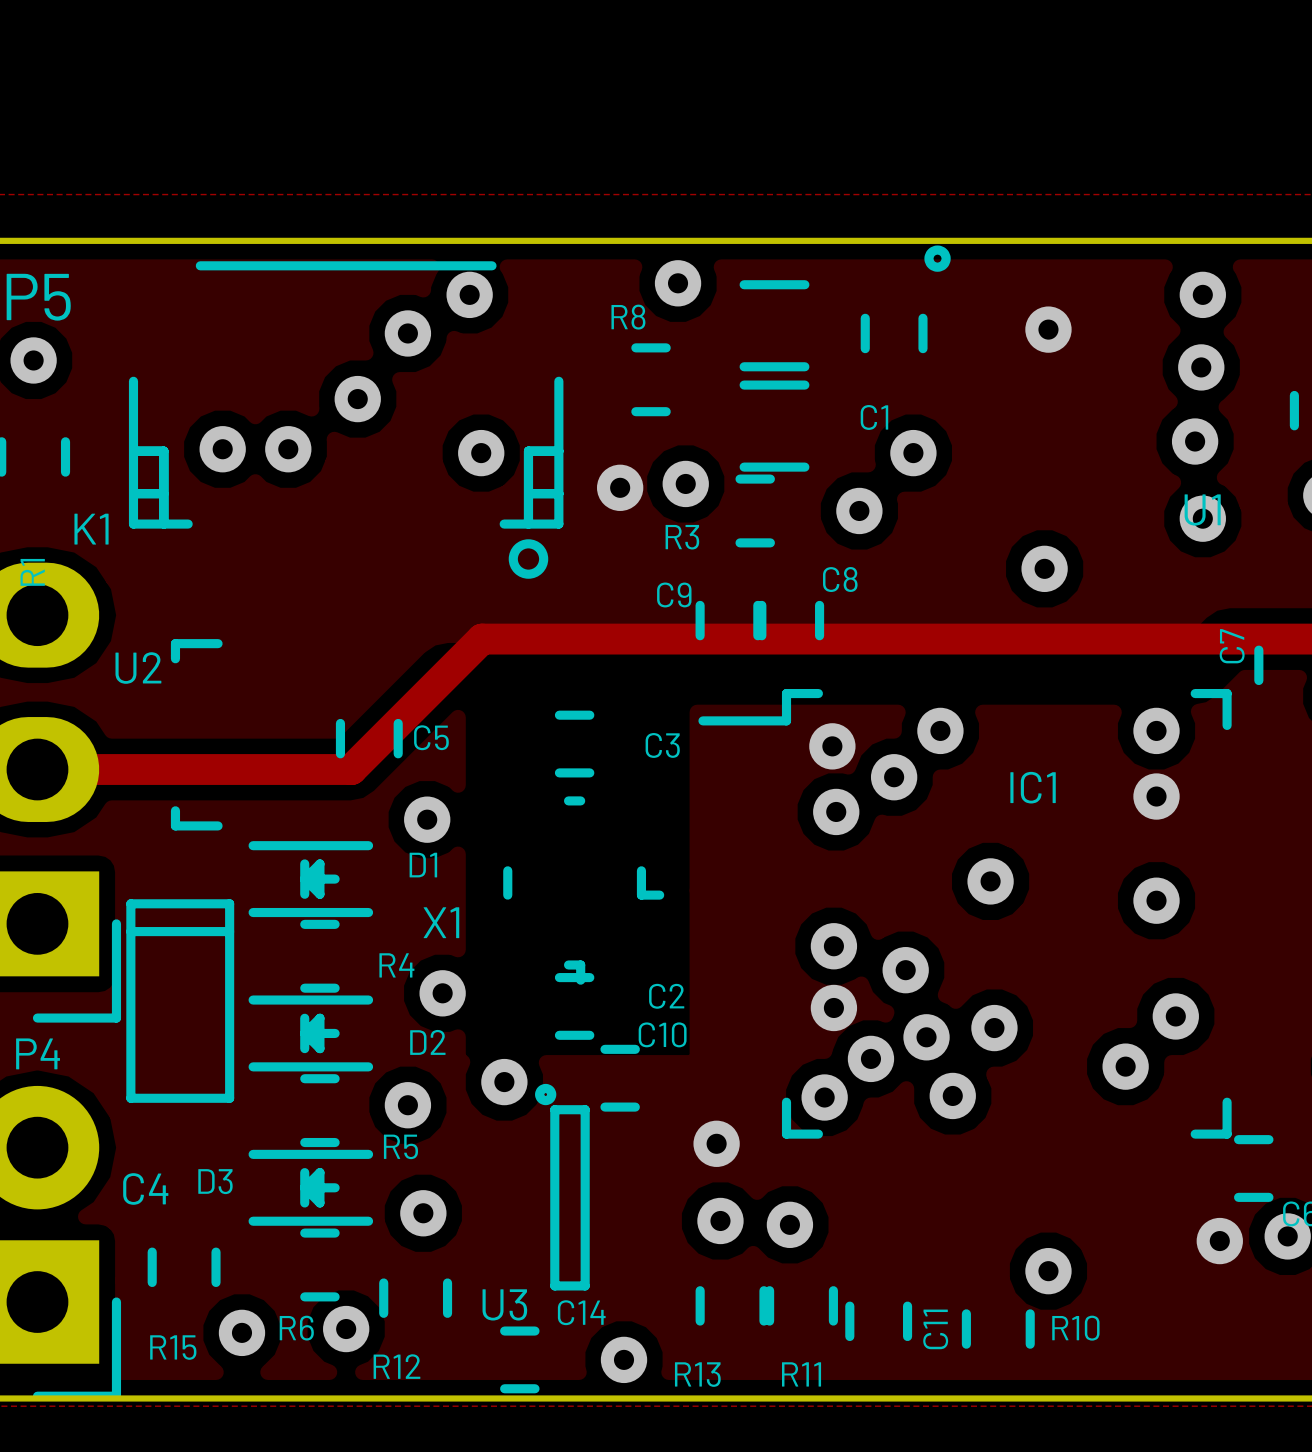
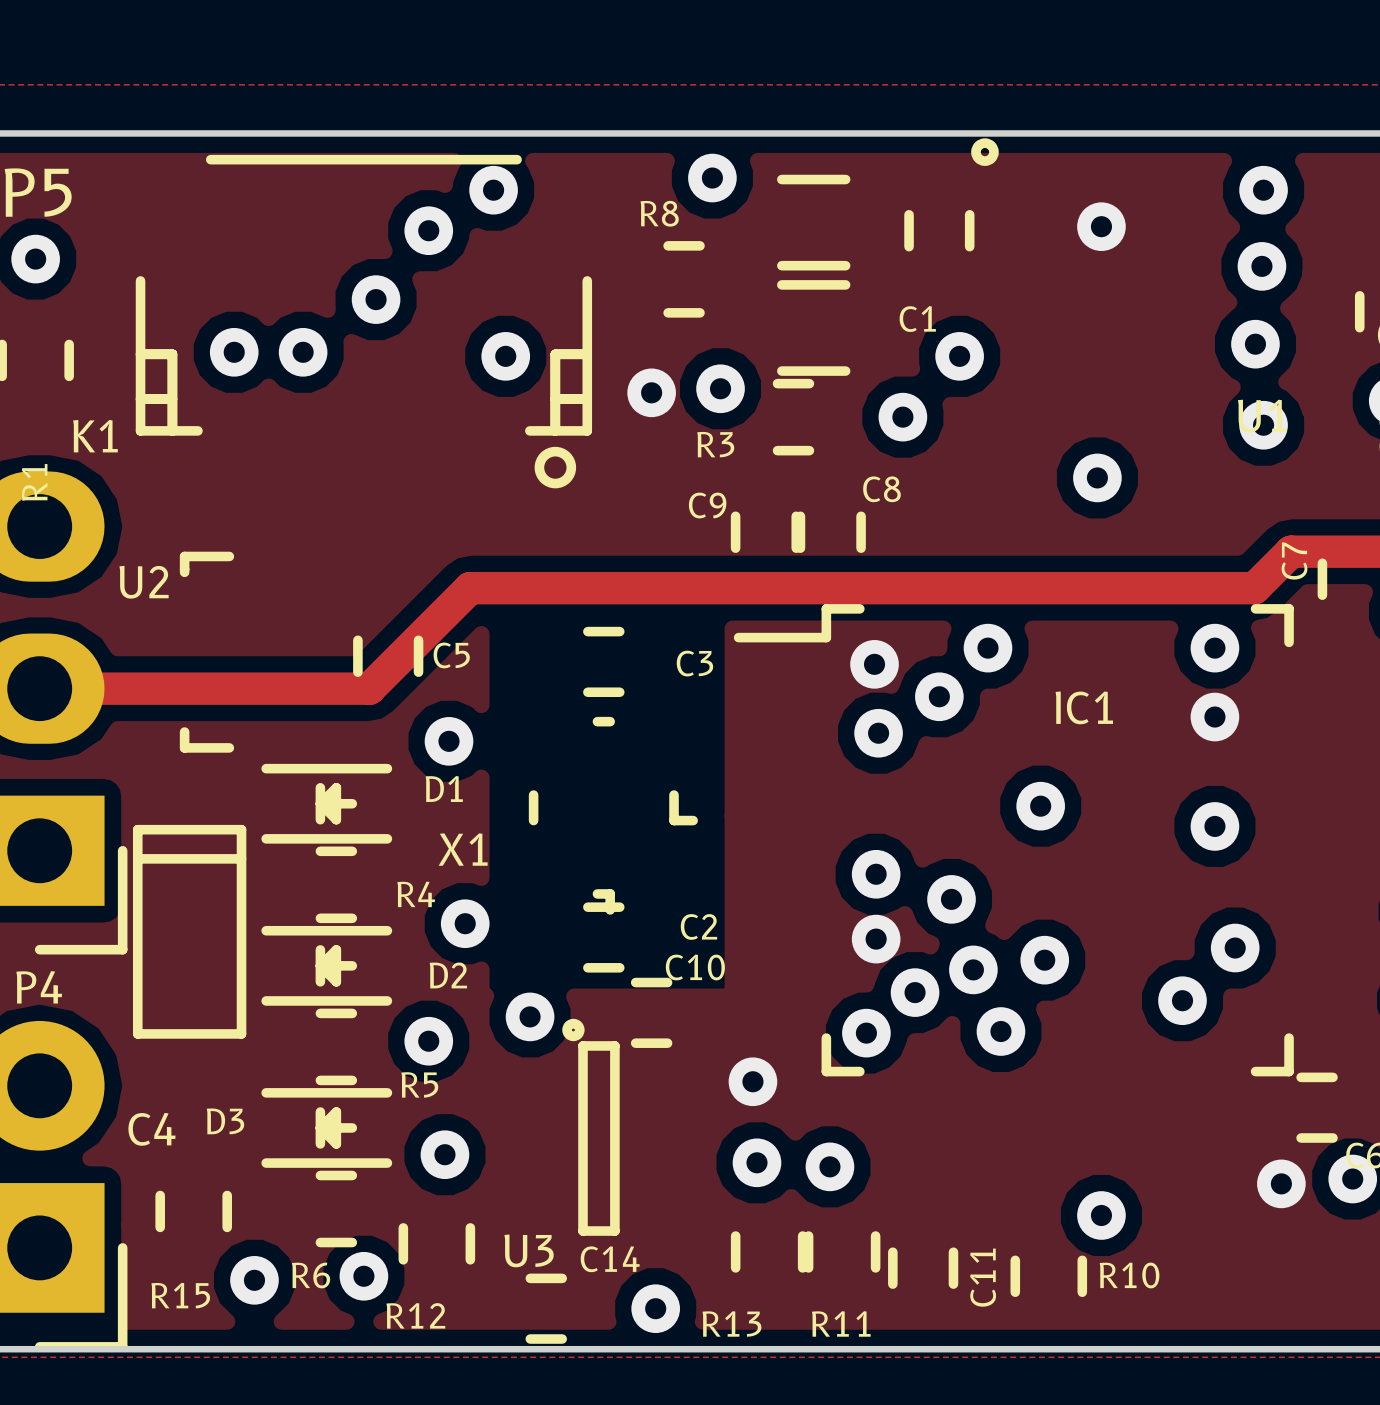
track: (1229, 639) (482, 639) (447, 673) -> (1291, 551) (1254, 588) (470, 588)

